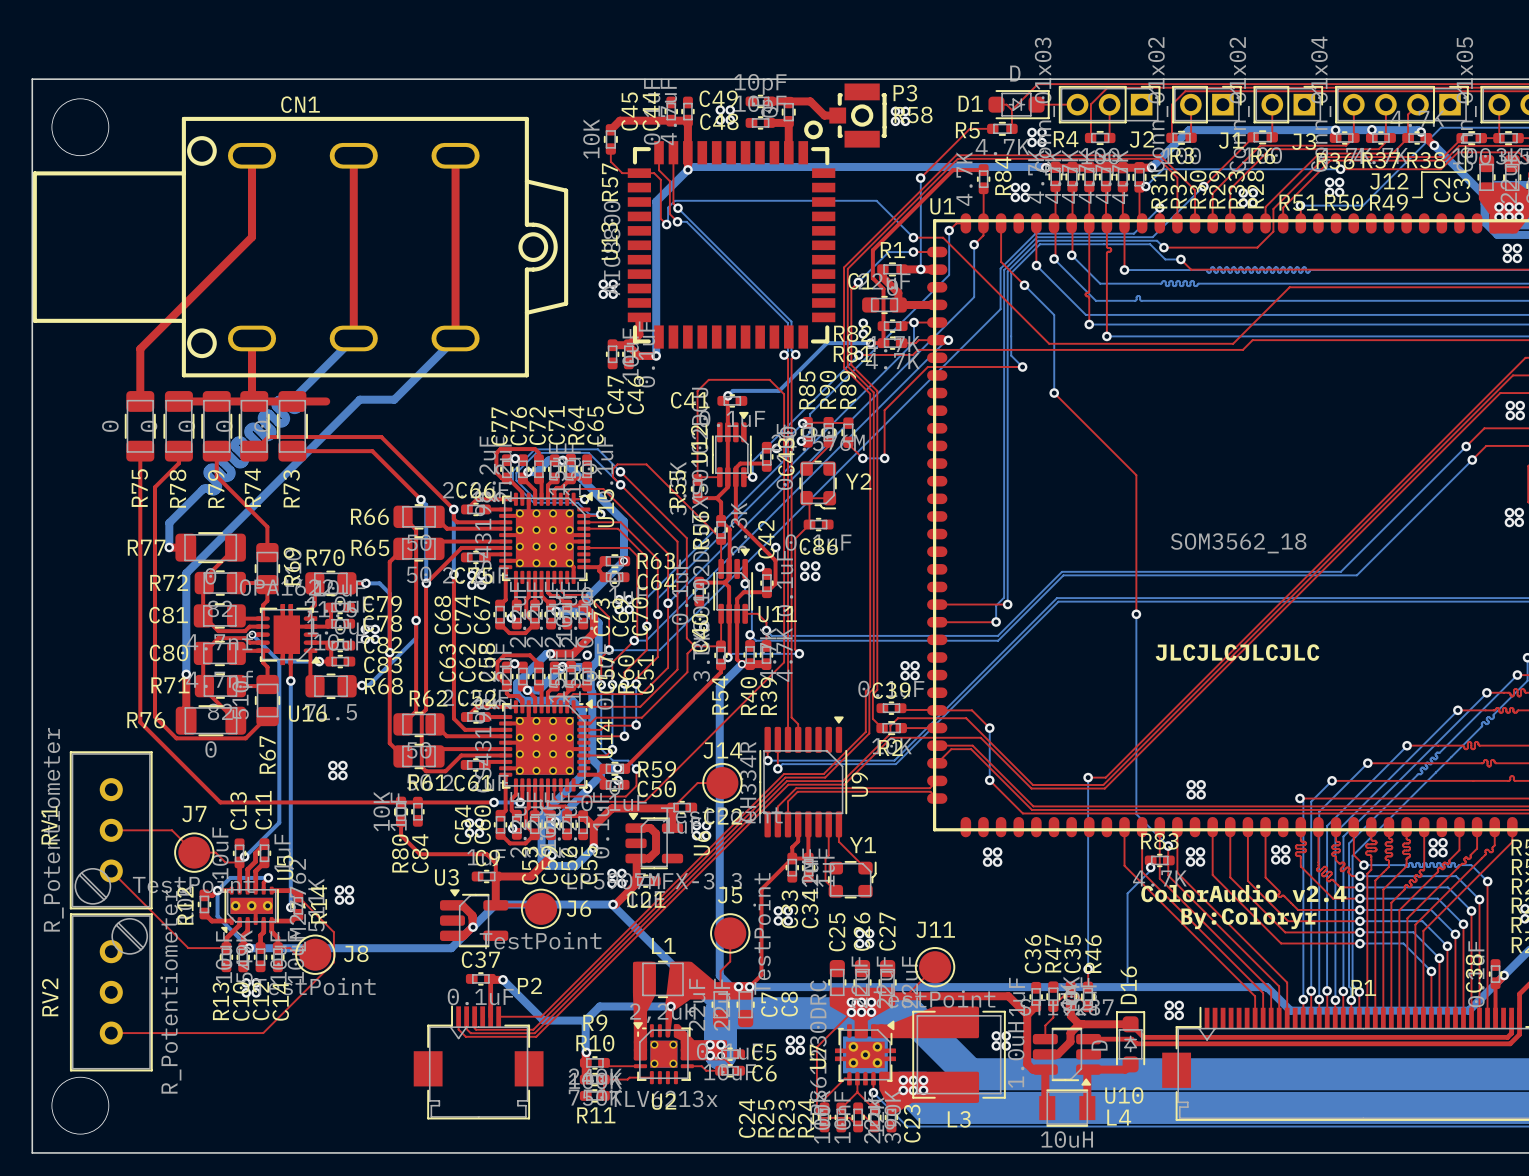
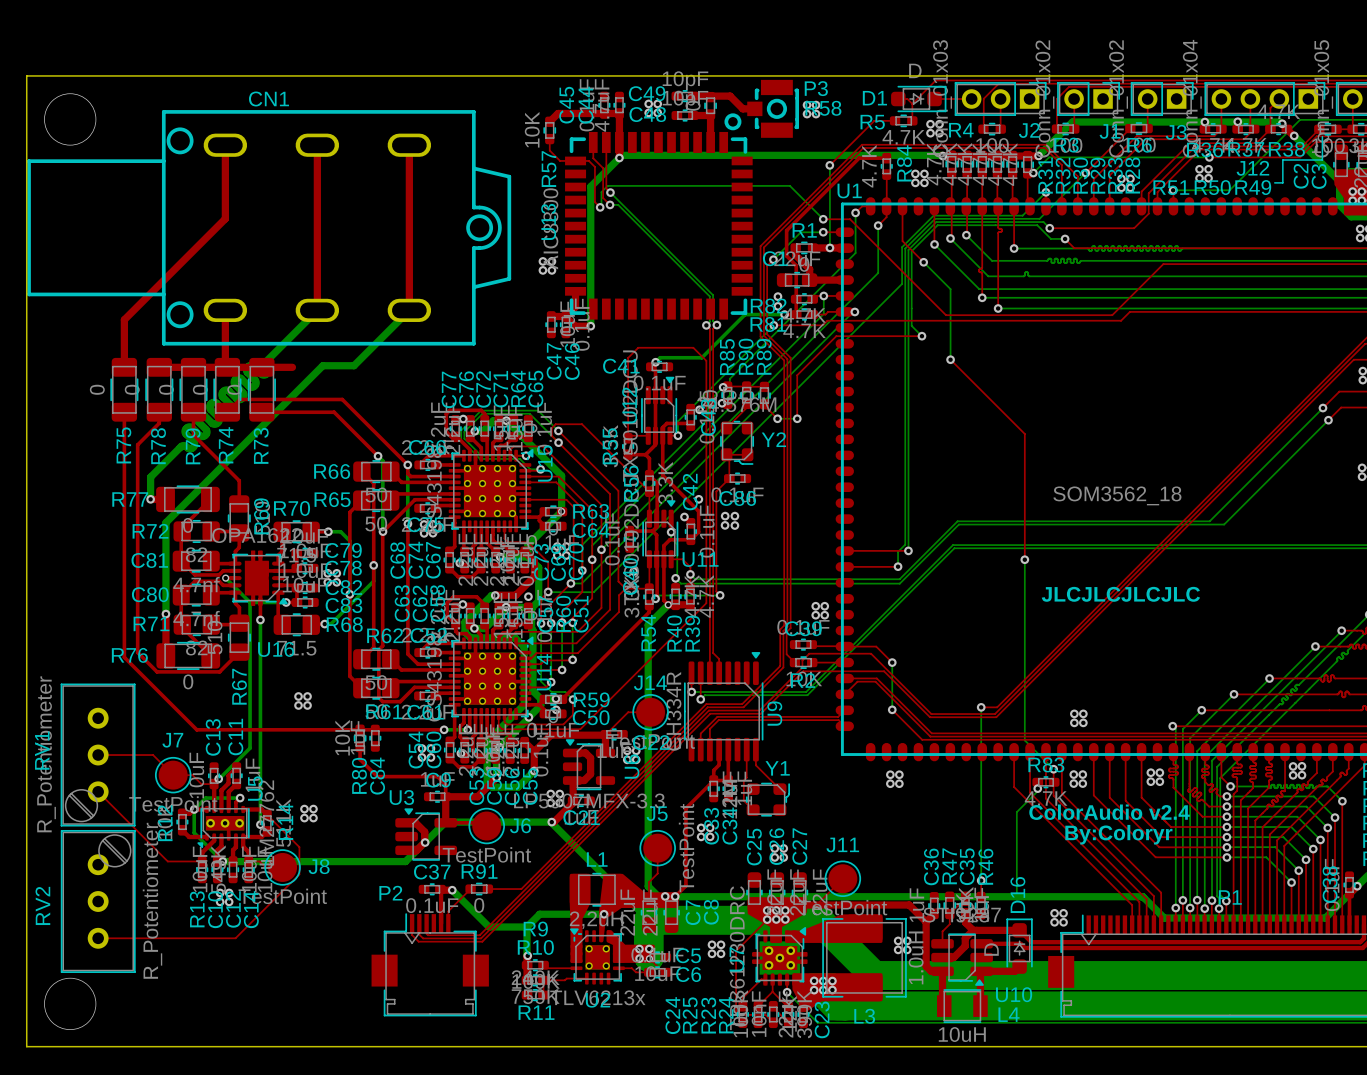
R91: none -> 0 (479, 889)
top track: none -> (487, 889) (521, 889)
top track: (579, 978) (541, 1016) (498, 1016) -> (470, 889) (448, 911) (448, 923)
P2 name position: P2 (529, 985) -> P2 (390, 893)

